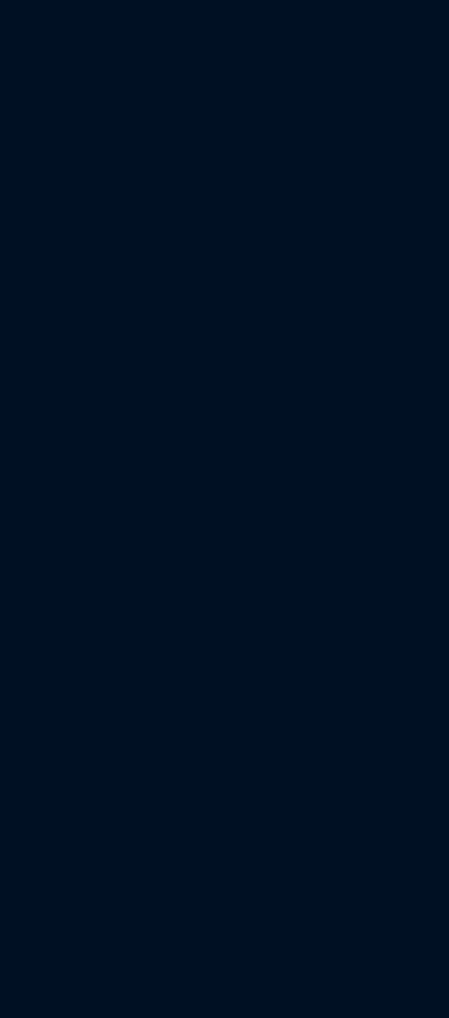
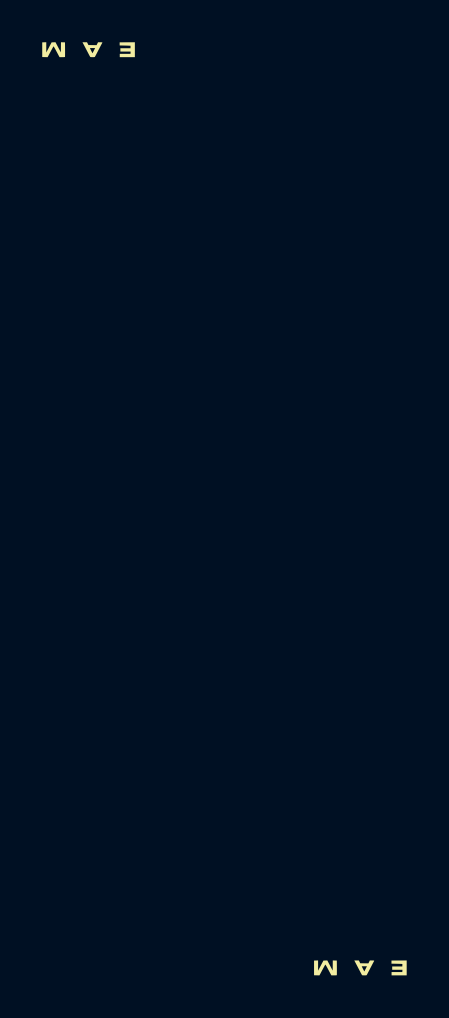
drawing: none -> [42, 42, 66, 58]
drawing: none -> [82, 42, 103, 58]
drawing: none -> [119, 42, 135, 58]
drawing: none -> [314, 960, 337, 976]
drawing: none -> [354, 960, 375, 976]
drawing: none -> [391, 960, 407, 976]

